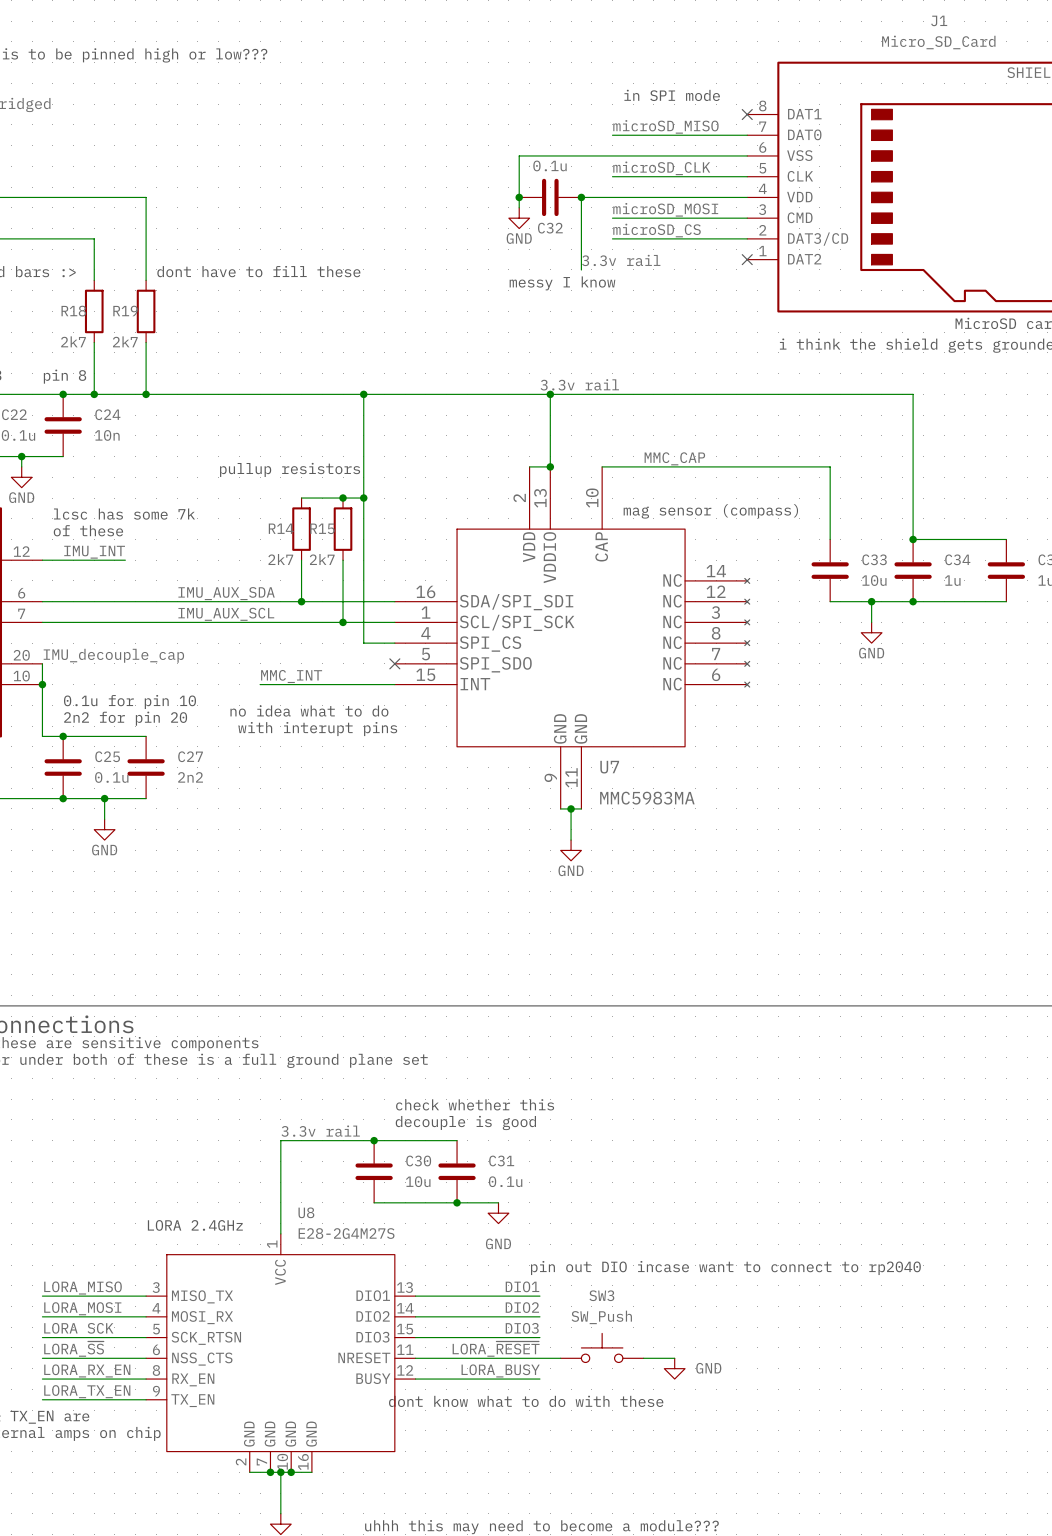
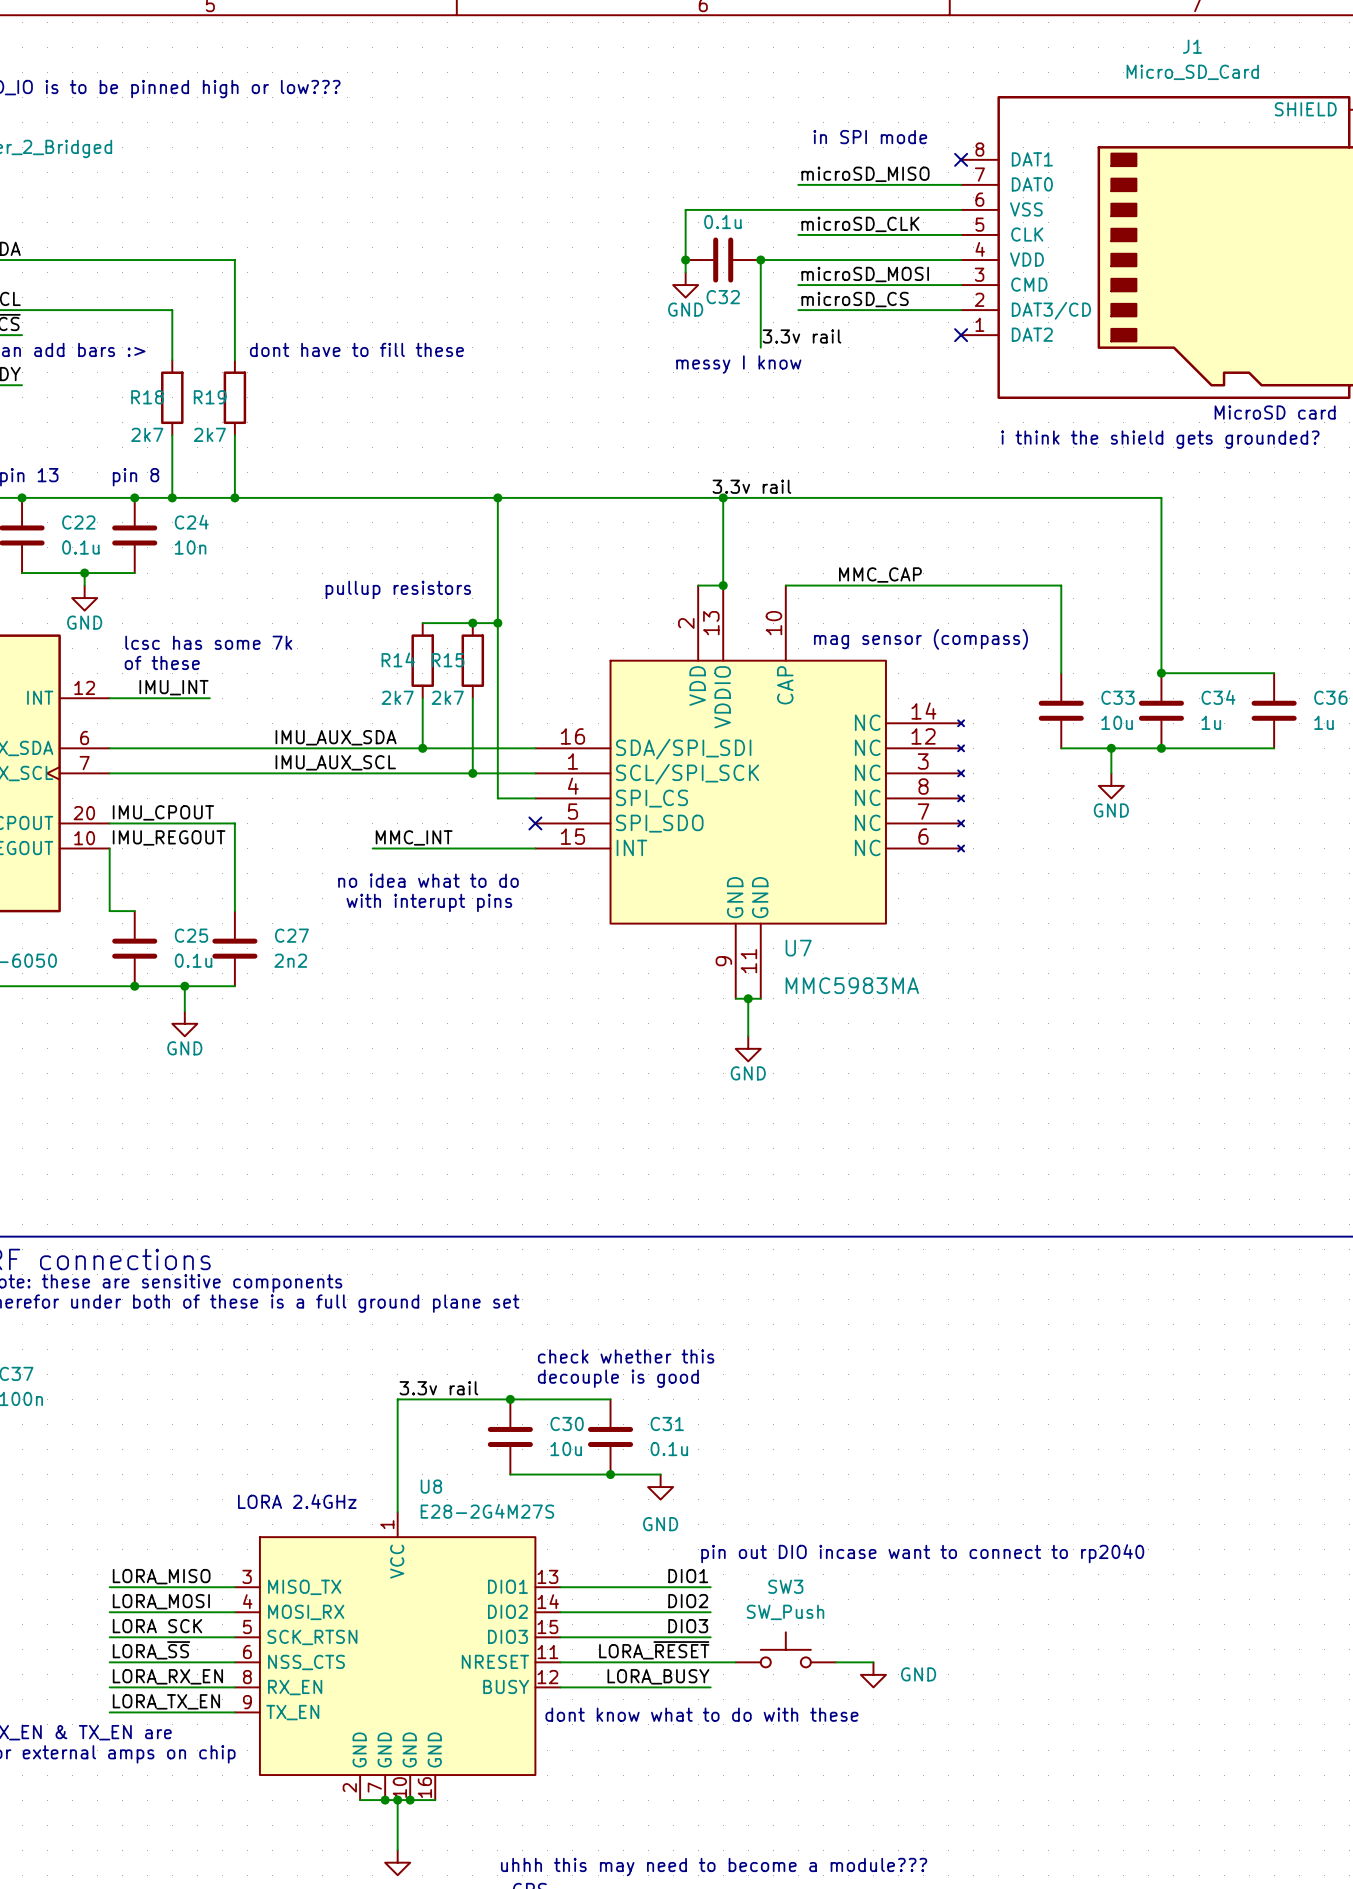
label: IMU_decouple_cap (113, 655) -> IMU_CPOUT (163, 812)
wire: (42, 663) (42, 684) -> none
label: none -> IMU_REGOUT (169, 837)
junction: (42, 684) -> none
text: 0.1u for pin 10 (129, 701) -> none
text: 2n2 for pin 20 (125, 718) -> none
wire: (63, 736) (146, 736) -> (109, 823) (234, 823) (234, 911)
junction: (63, 736) -> none

